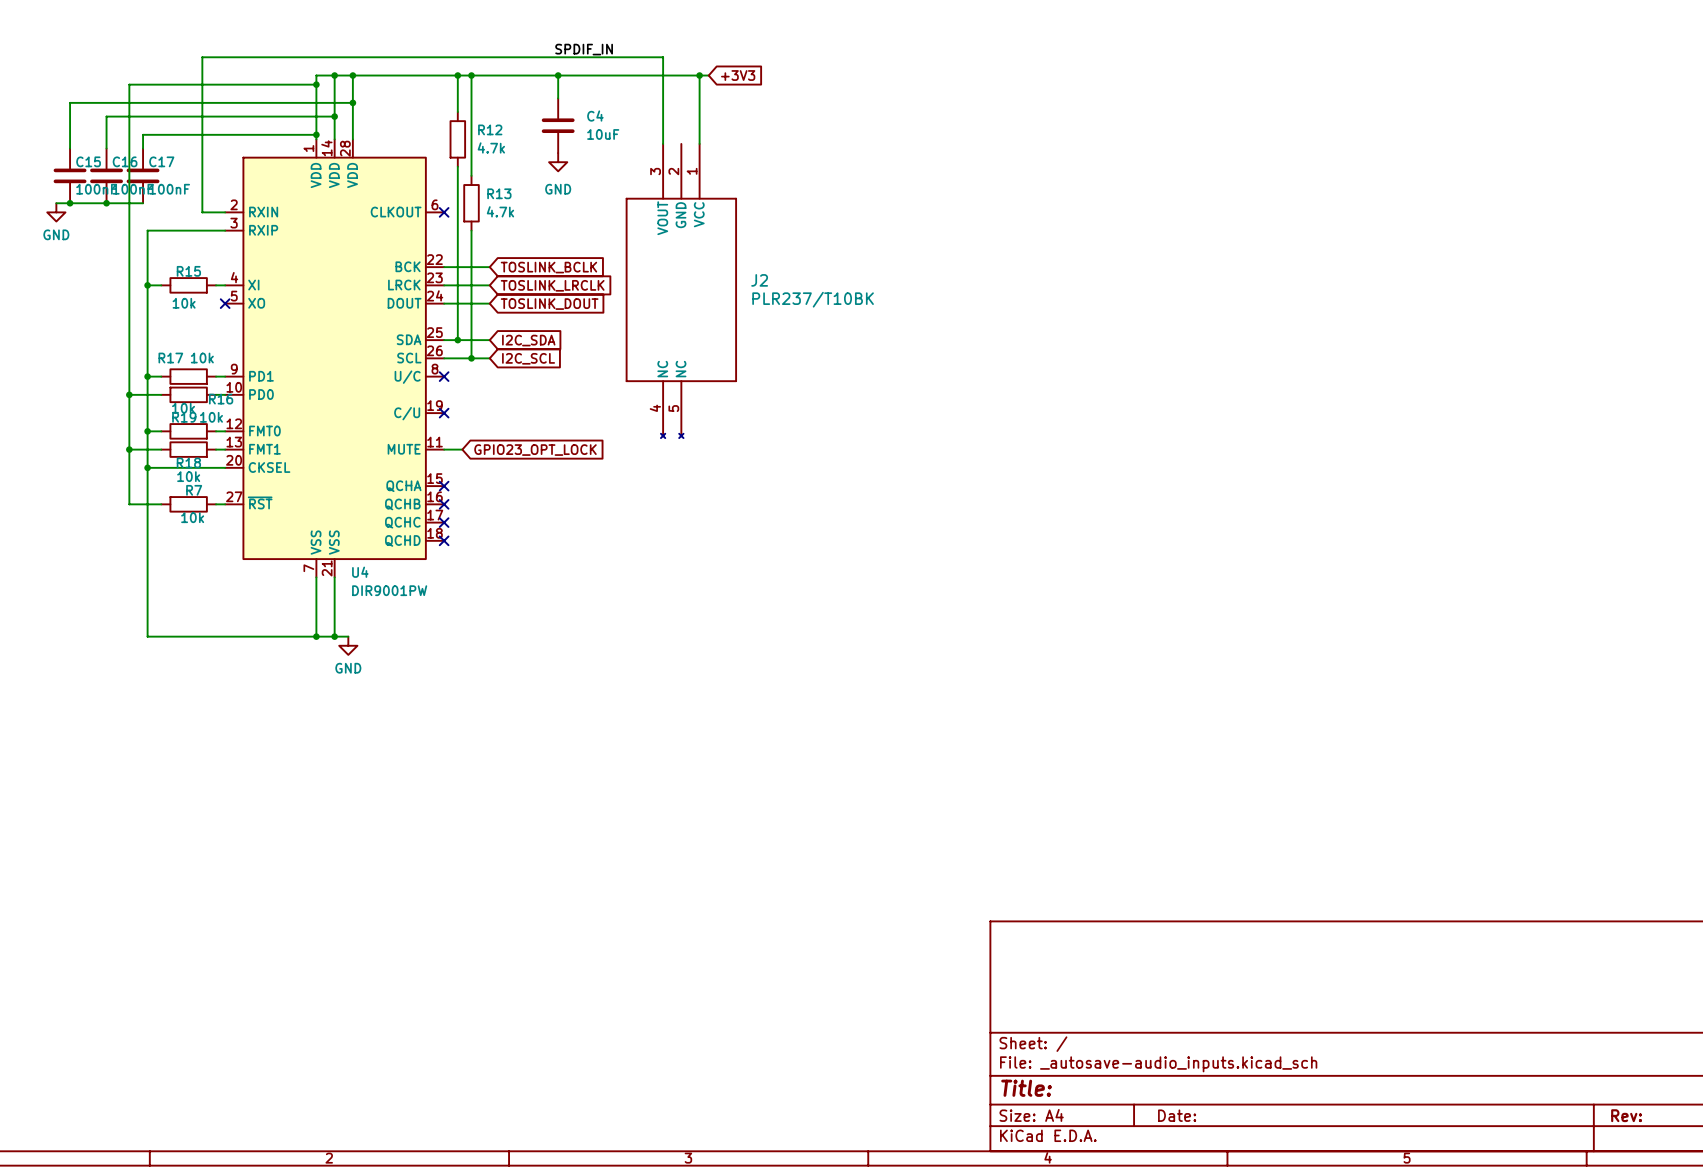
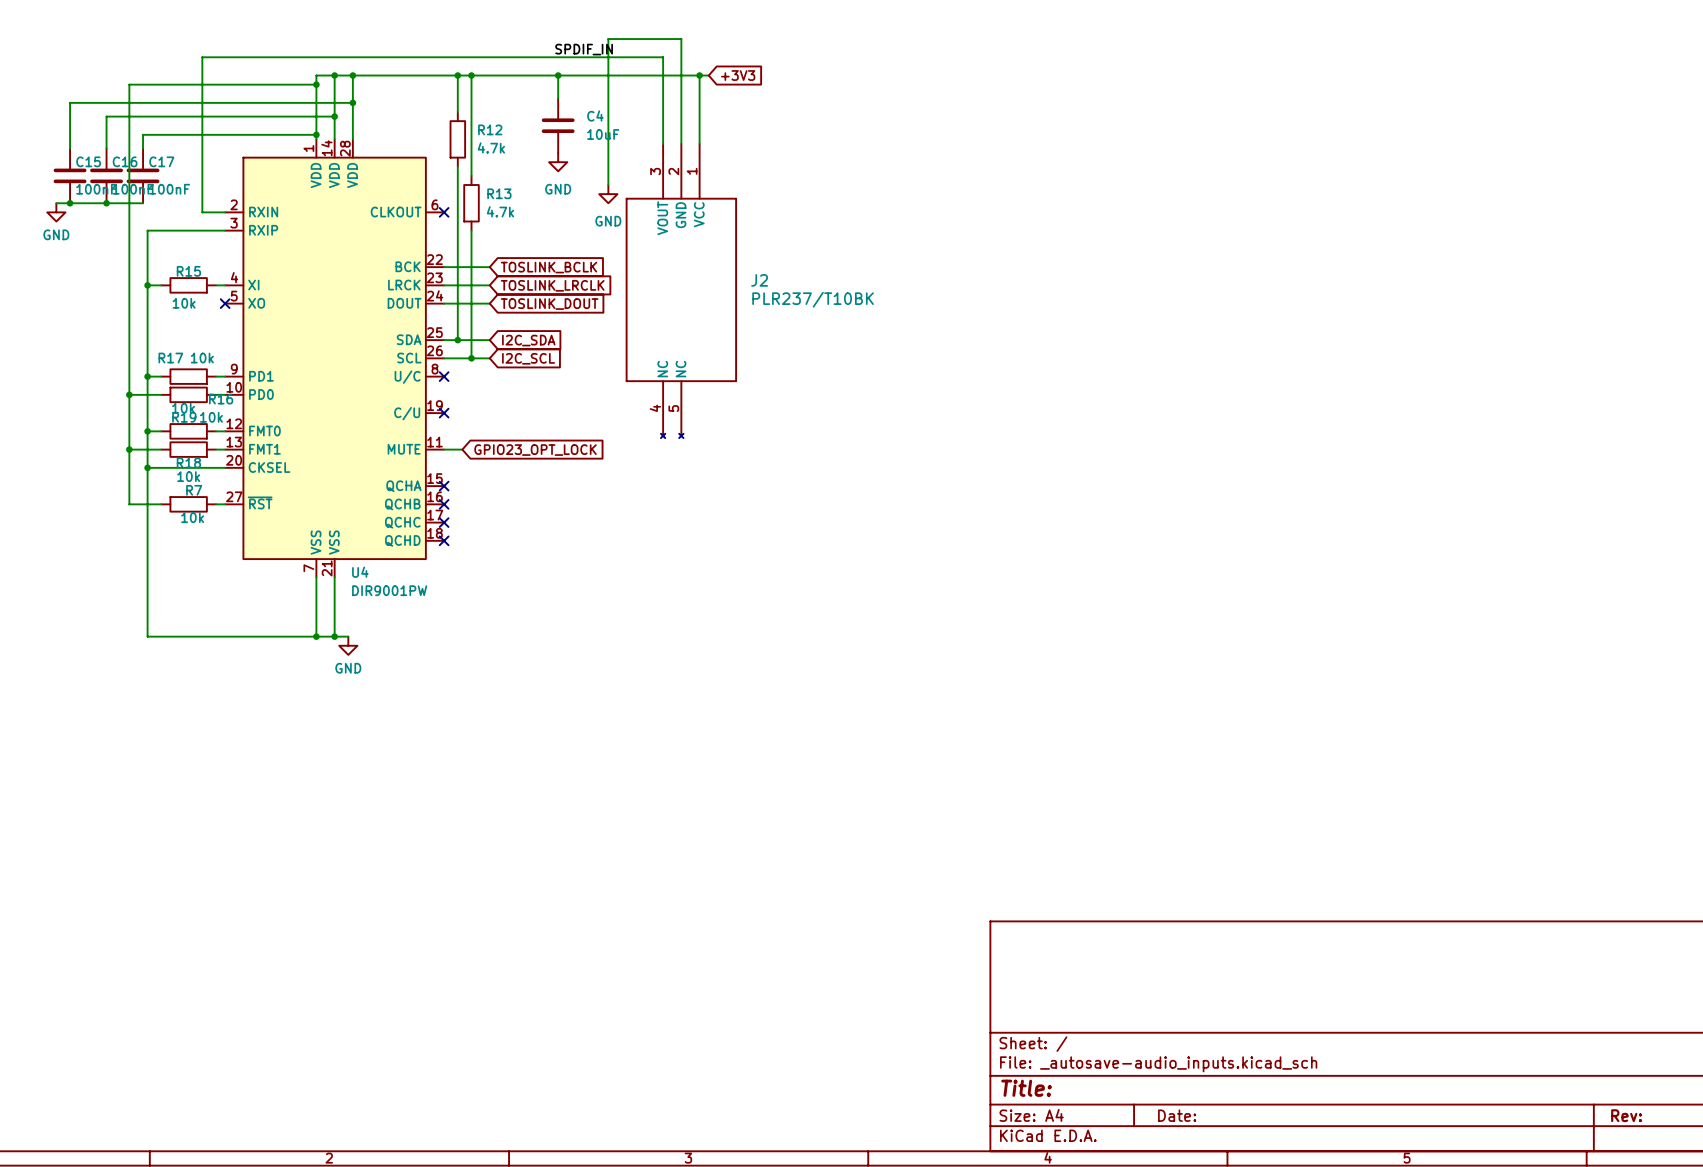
wire: none -> (681, 143) (681, 39) (608, 39) (608, 185)
power symbol: none -> GND (608, 194)

